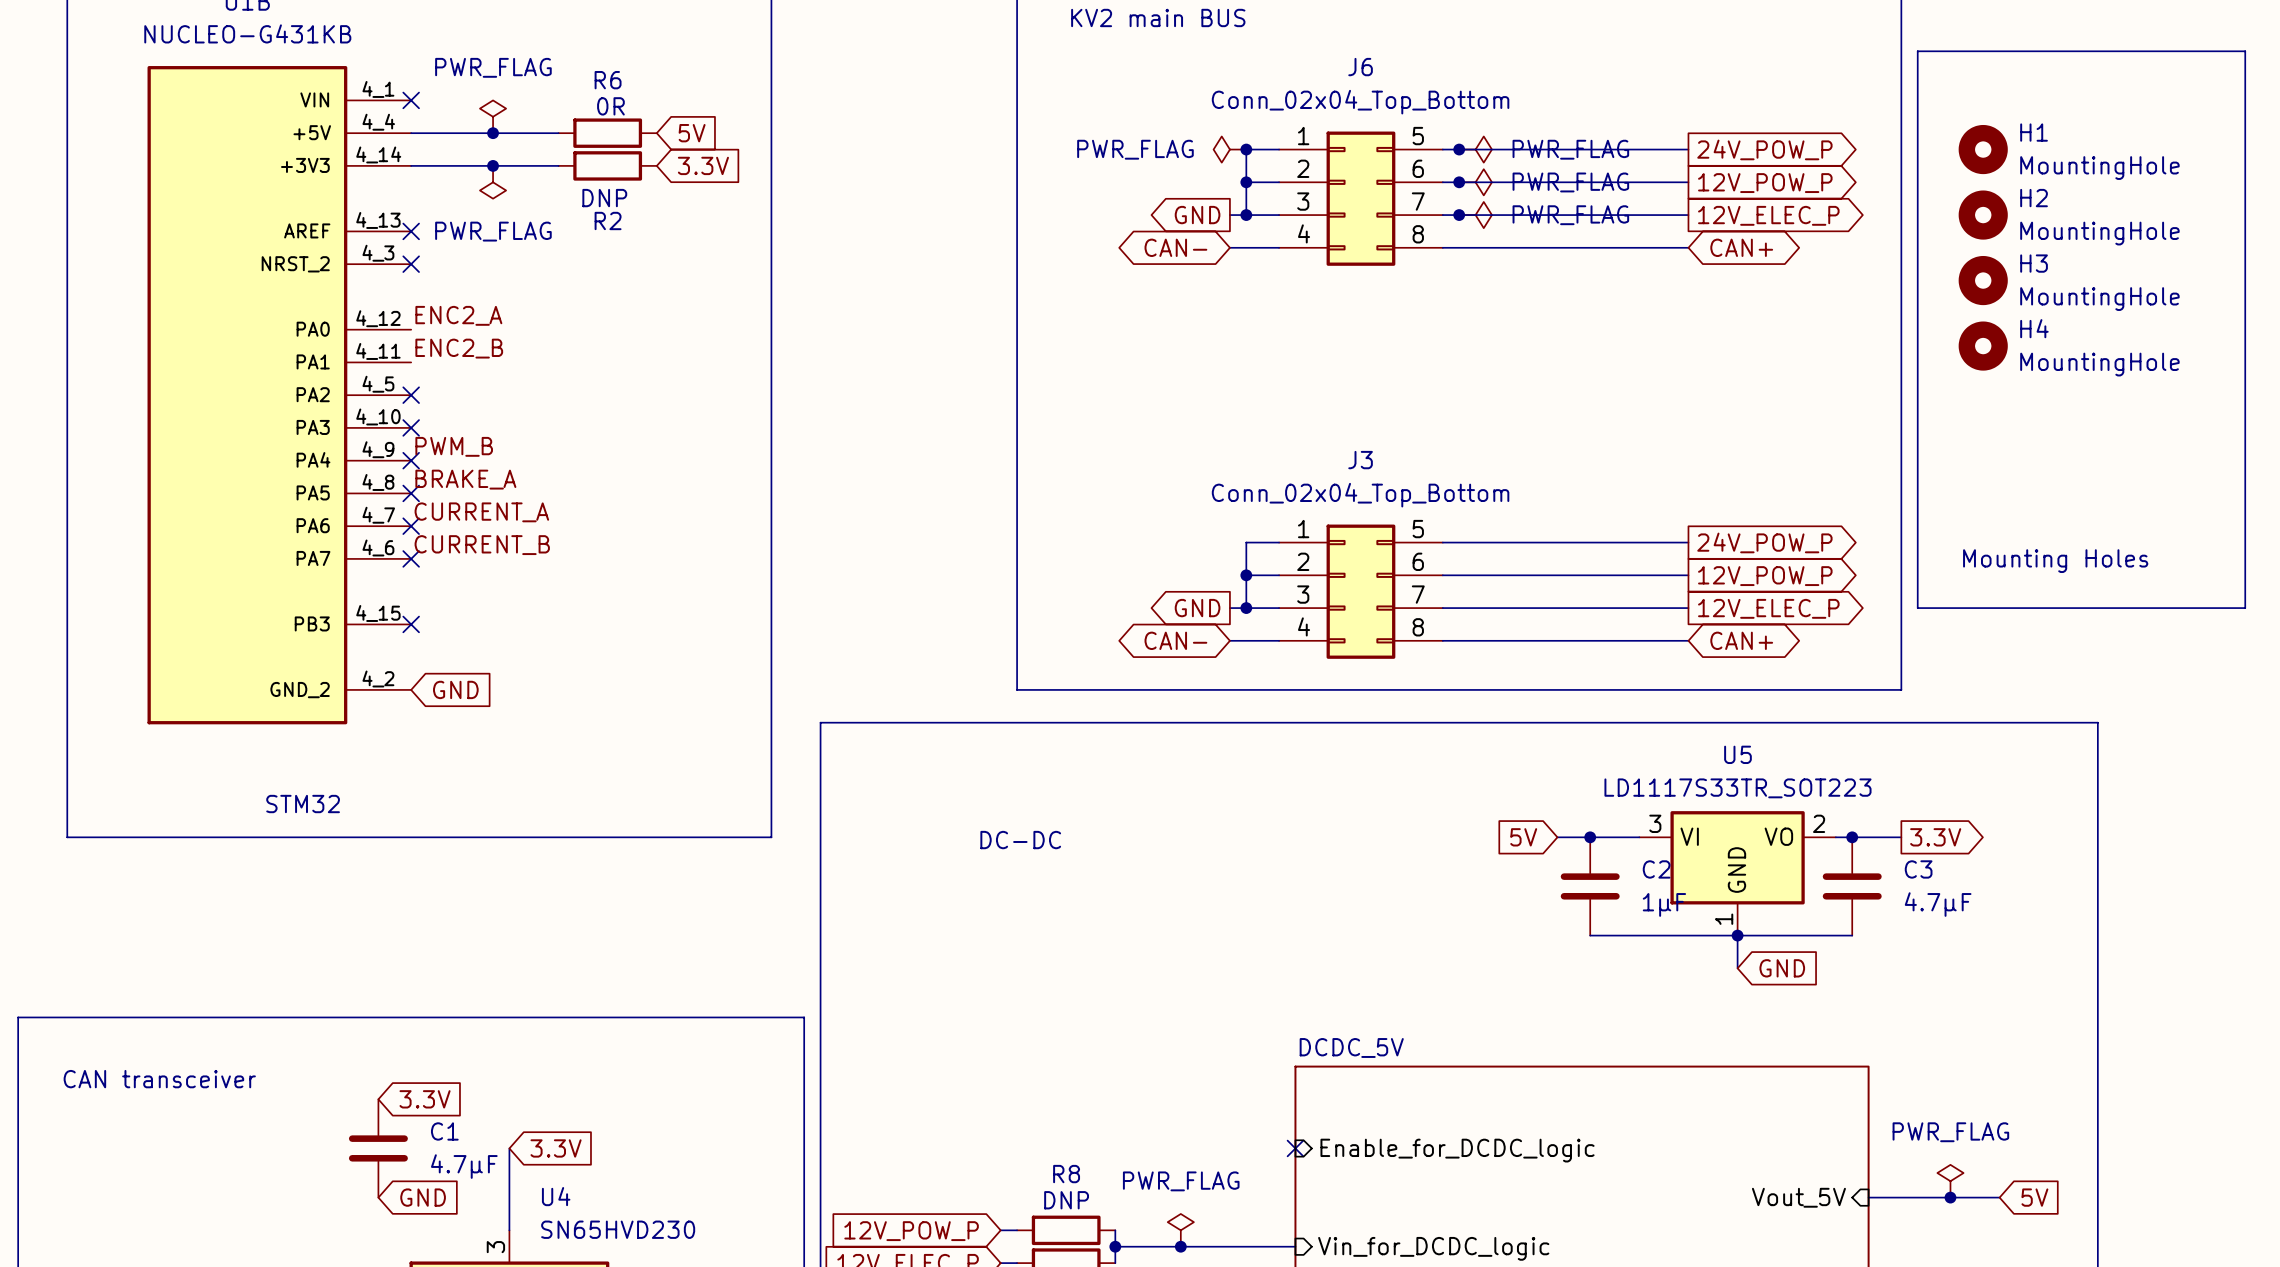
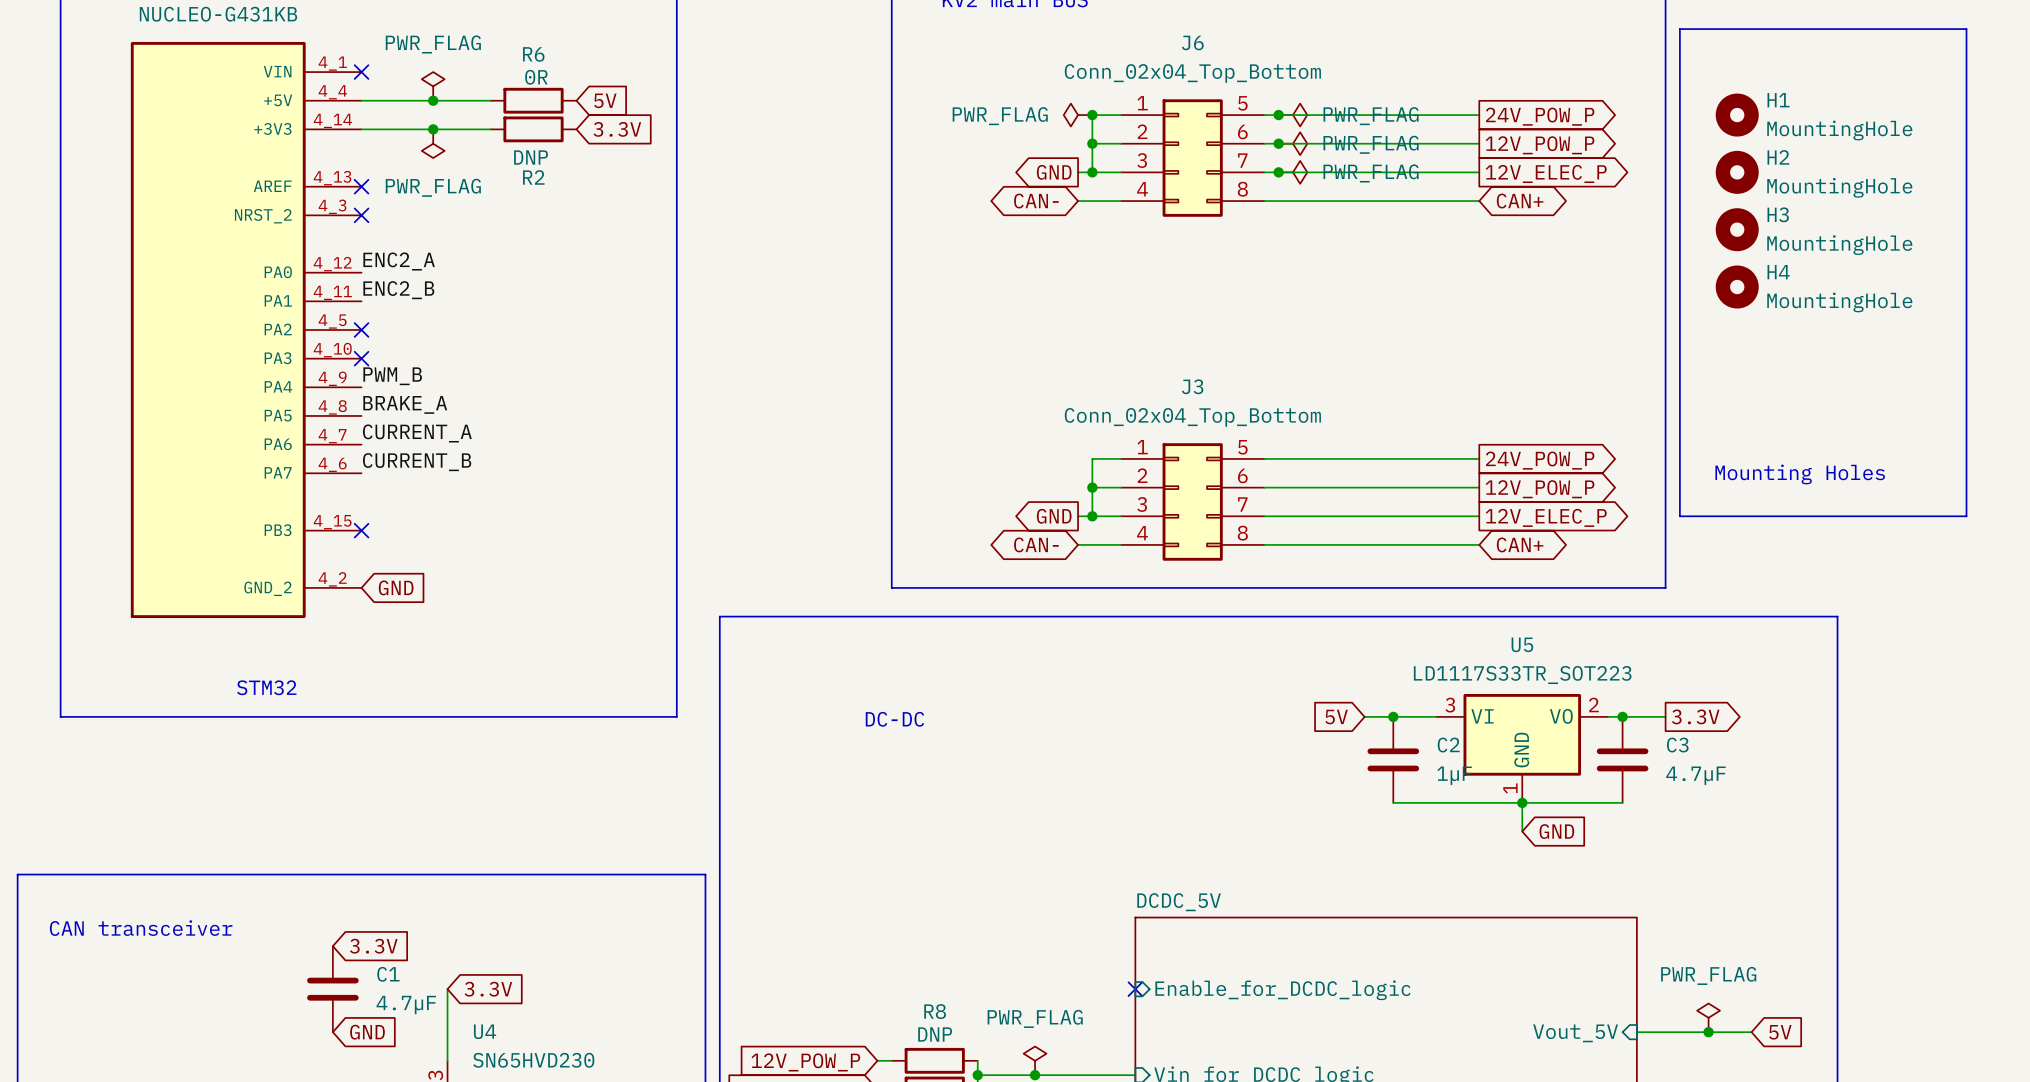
no-connect mark: (411, 460) -> none
no-connect mark: (411, 493) -> none
no-connect mark: (411, 526) -> none
no-connect mark: (411, 558) -> none

